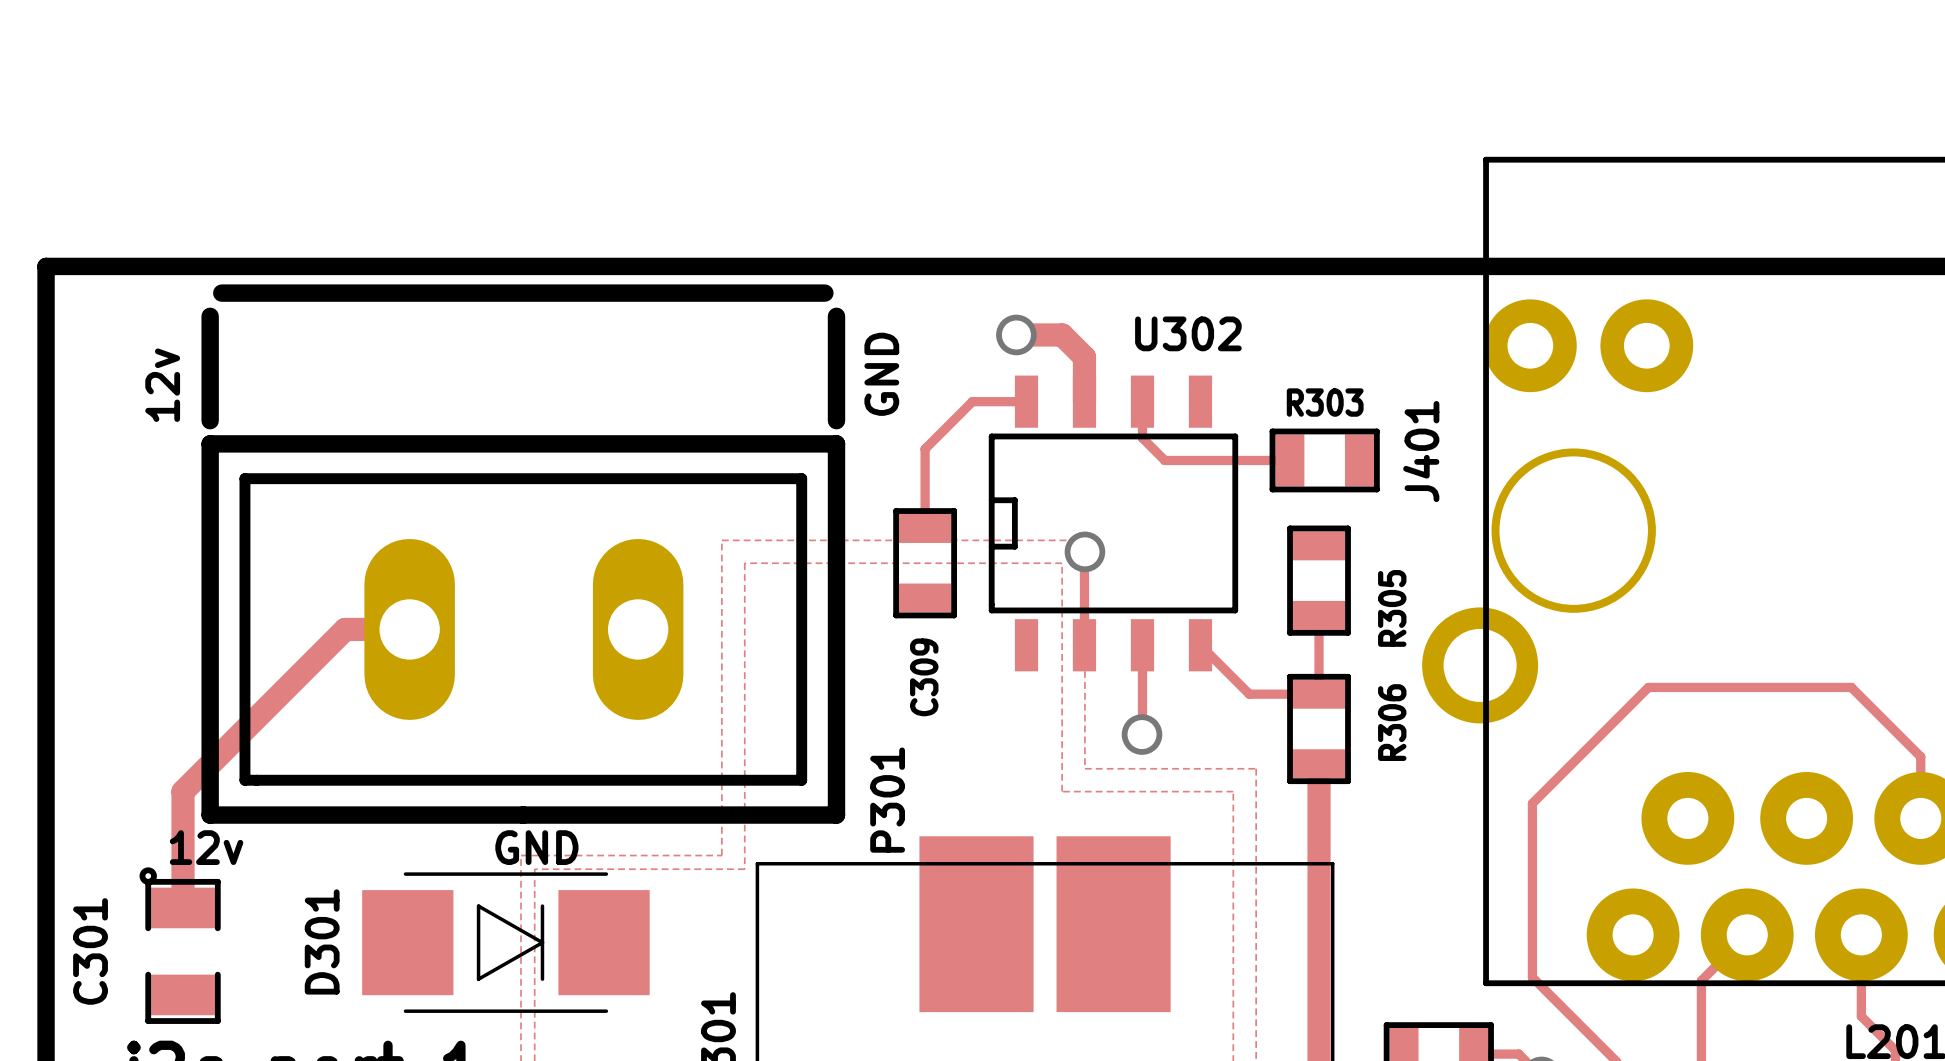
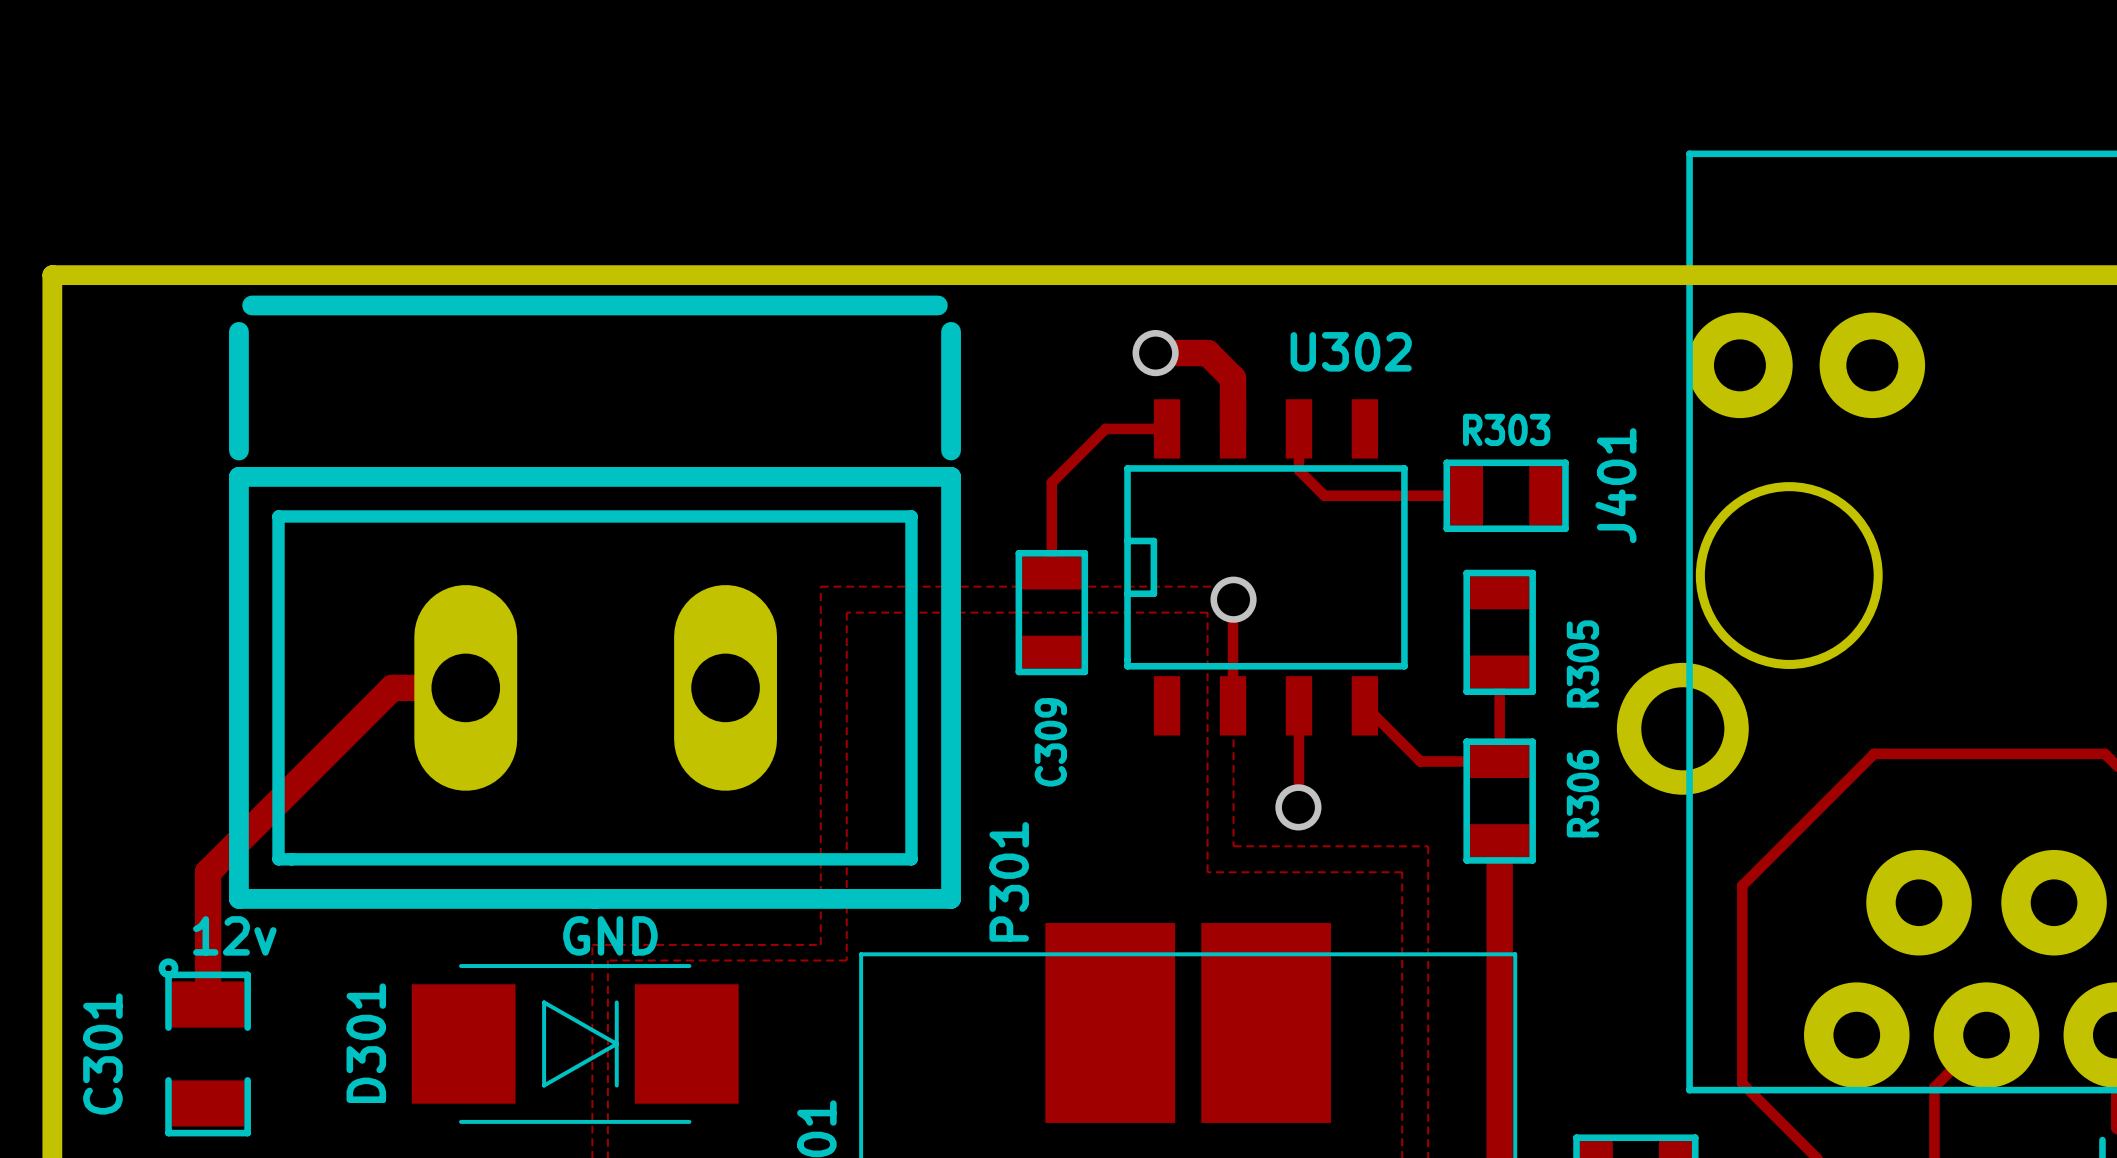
text: GND (881, 374) -> none
text: 12v (162, 385) -> none

